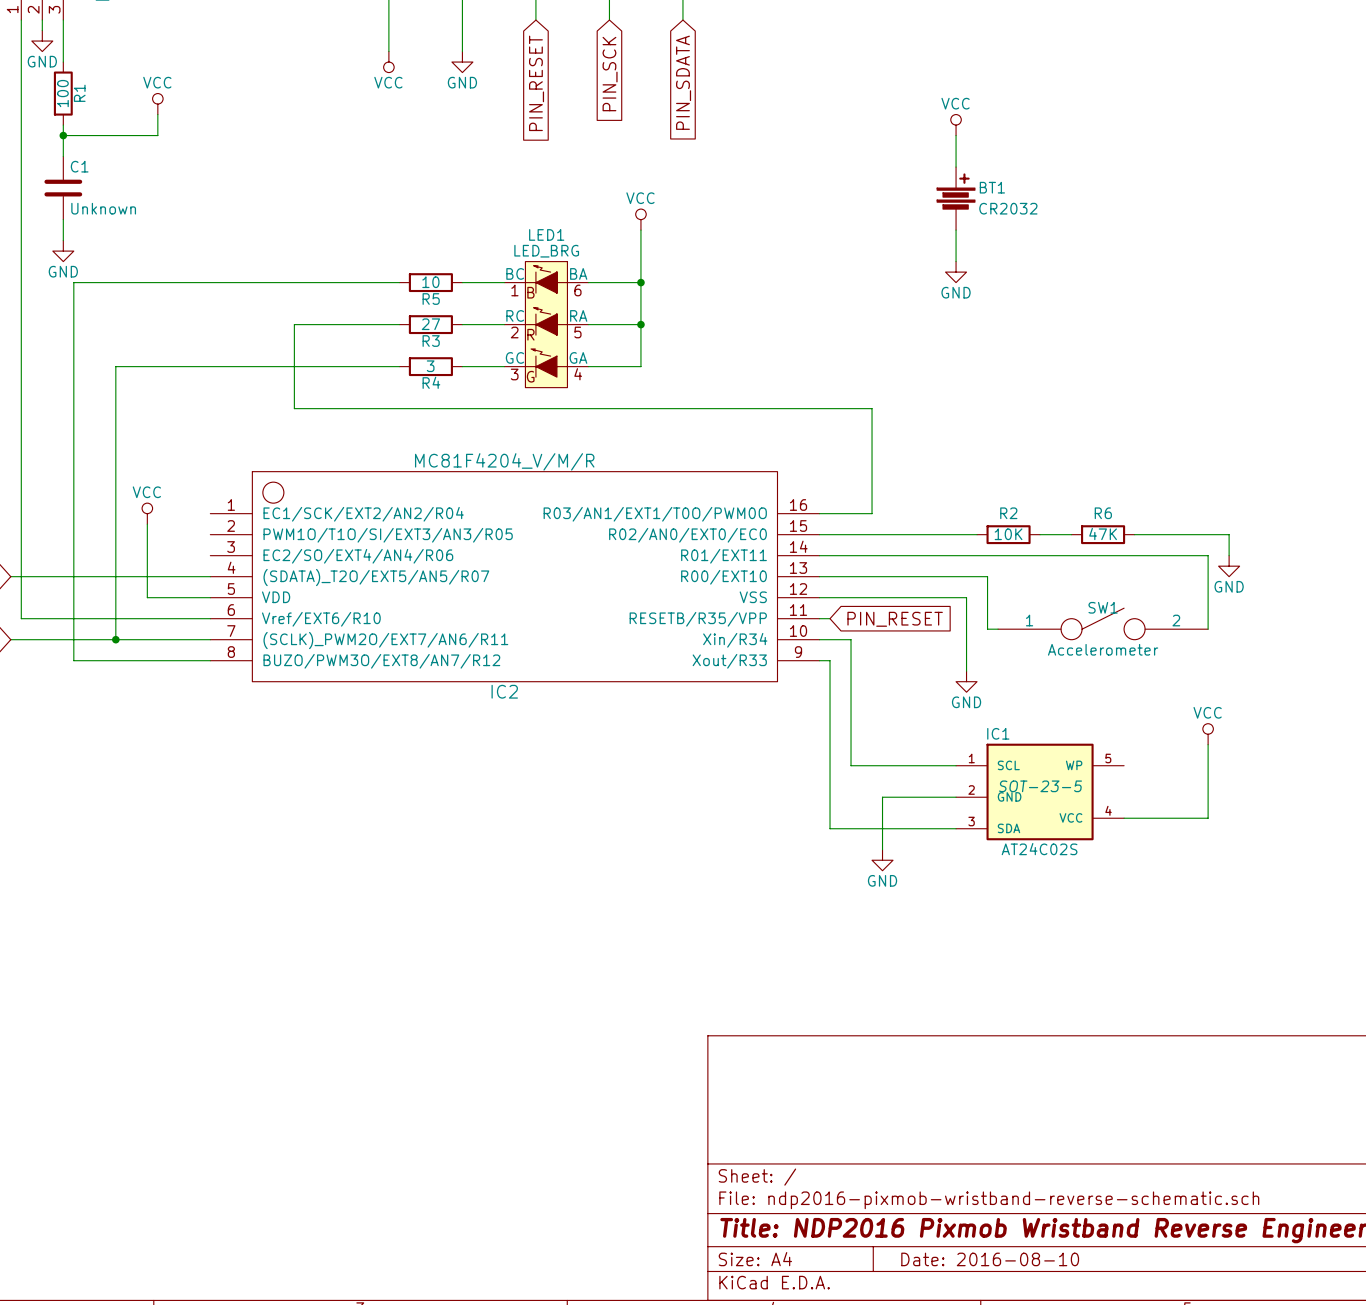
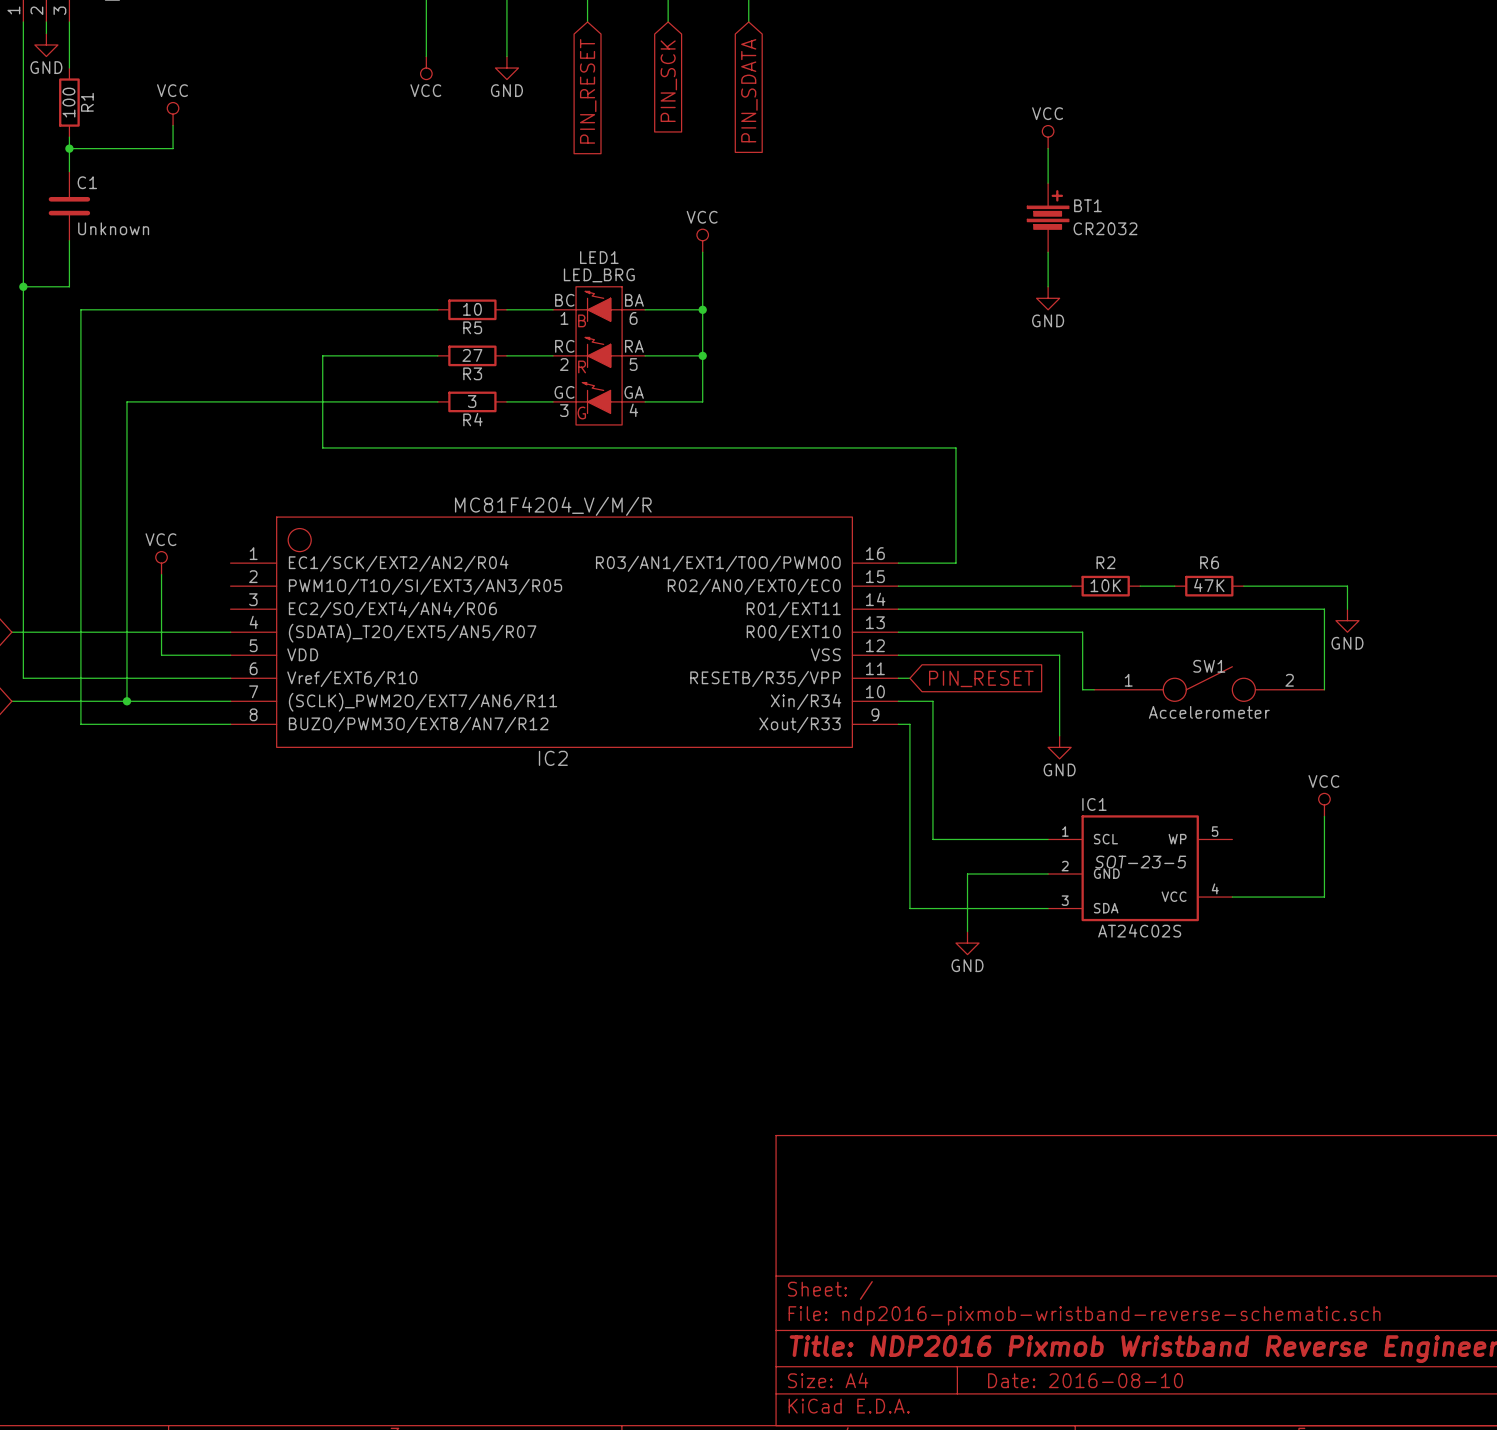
wire: none -> (69, 263) (69, 286) (23, 286)
power symbol: GND (63, 251) -> none
junction: none -> (23, 286)

